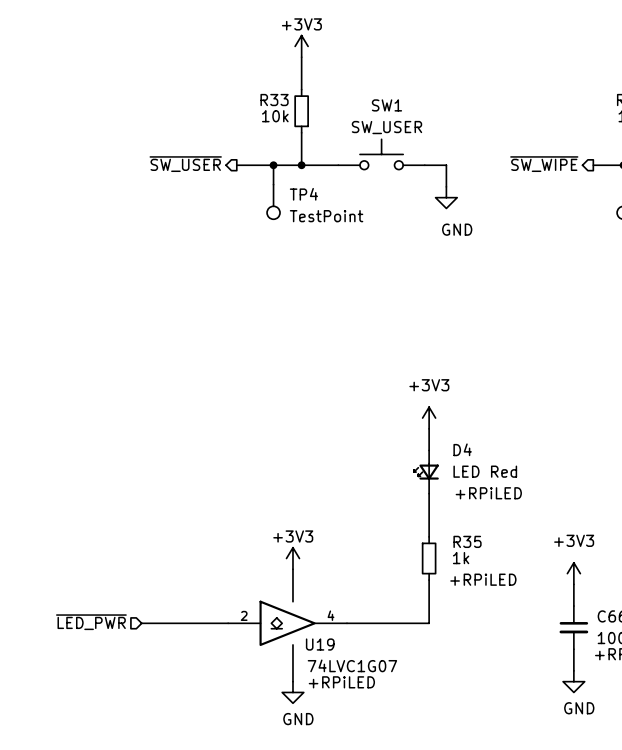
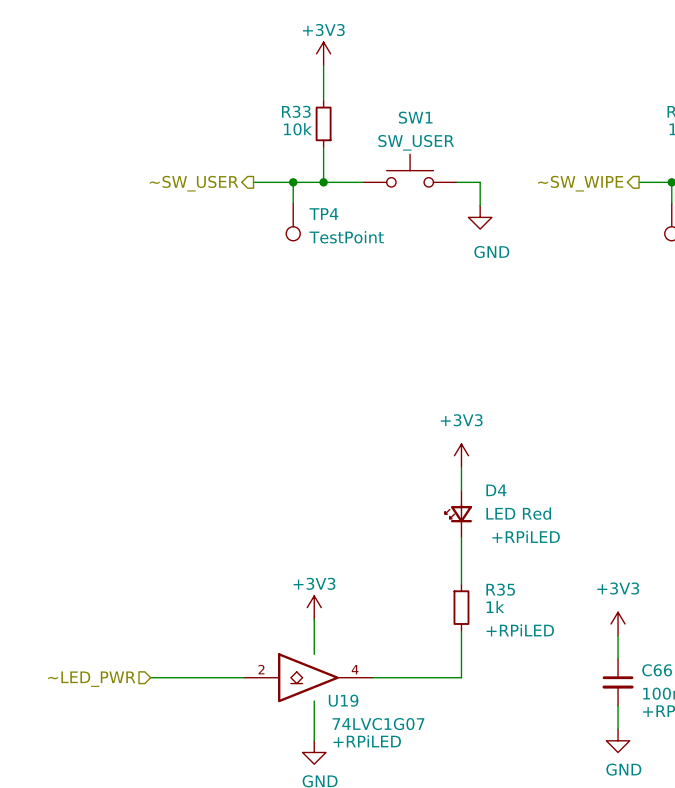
hierarchical label: ~{SW_USER} (185, 164) -> ~SW_USER (193, 183)
hierarchical label: ~{SW_WIPE} (544, 164) -> ~SW_WIPE (580, 183)
hierarchical label: ~{LED_PWR} (91, 622) -> ~LED_PWR (91, 679)

